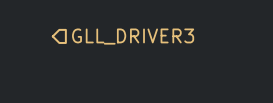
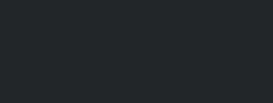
hierarchical label: GLL_DRIVER3 (133, 36) -> none

